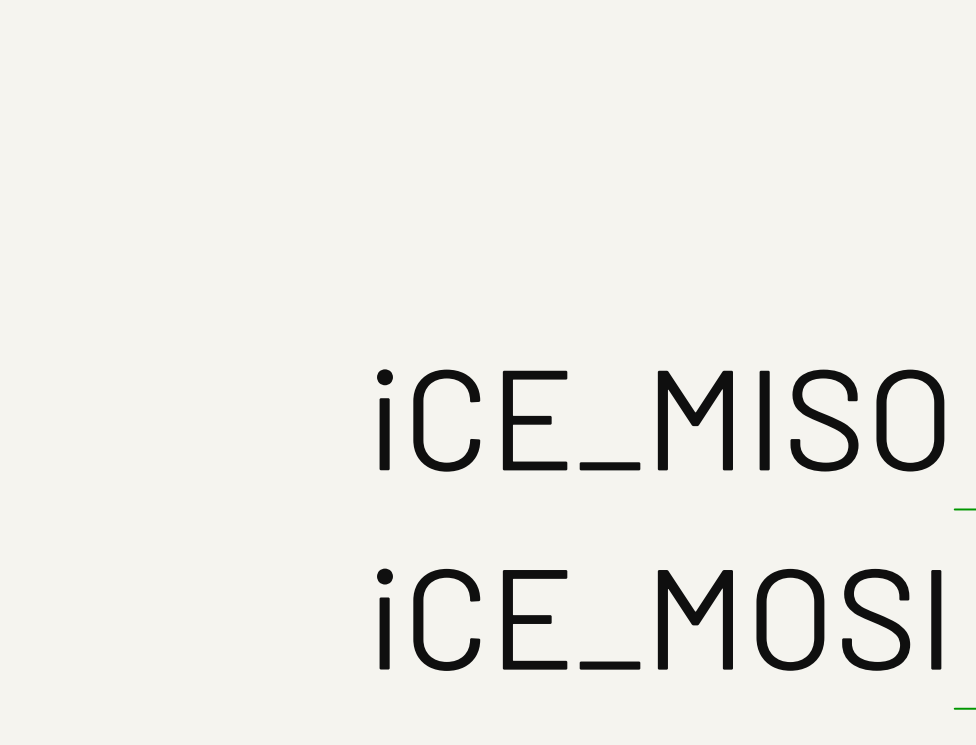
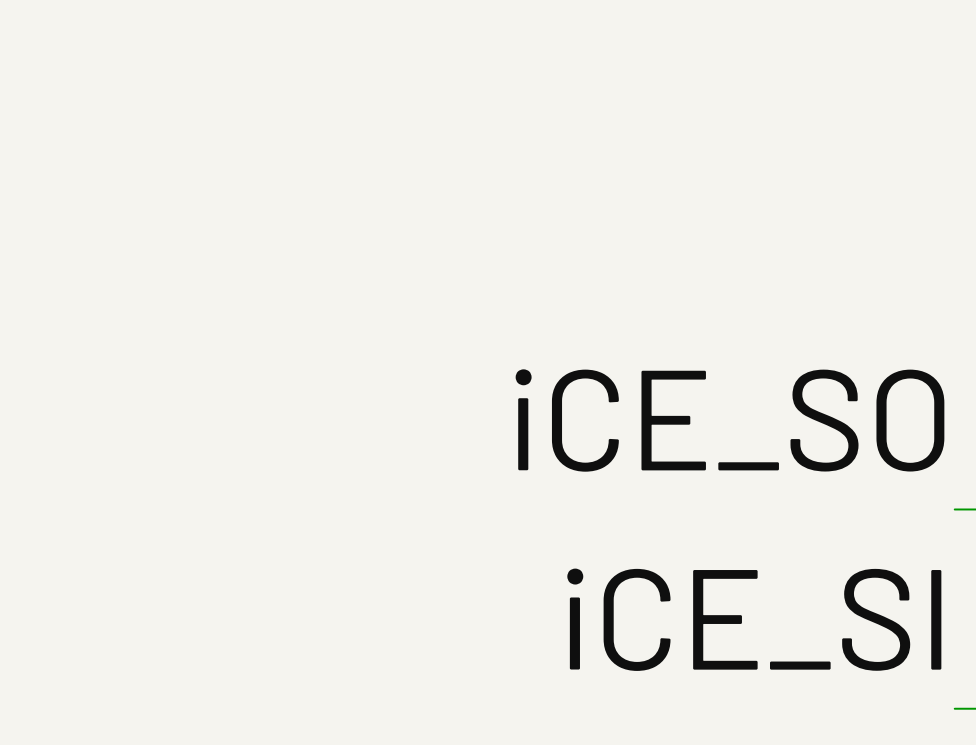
label: iCE_MISO (660, 420) -> iCE_SO (730, 420)
label: iCE_MOSI (659, 619) -> iCE_SI (754, 619)

